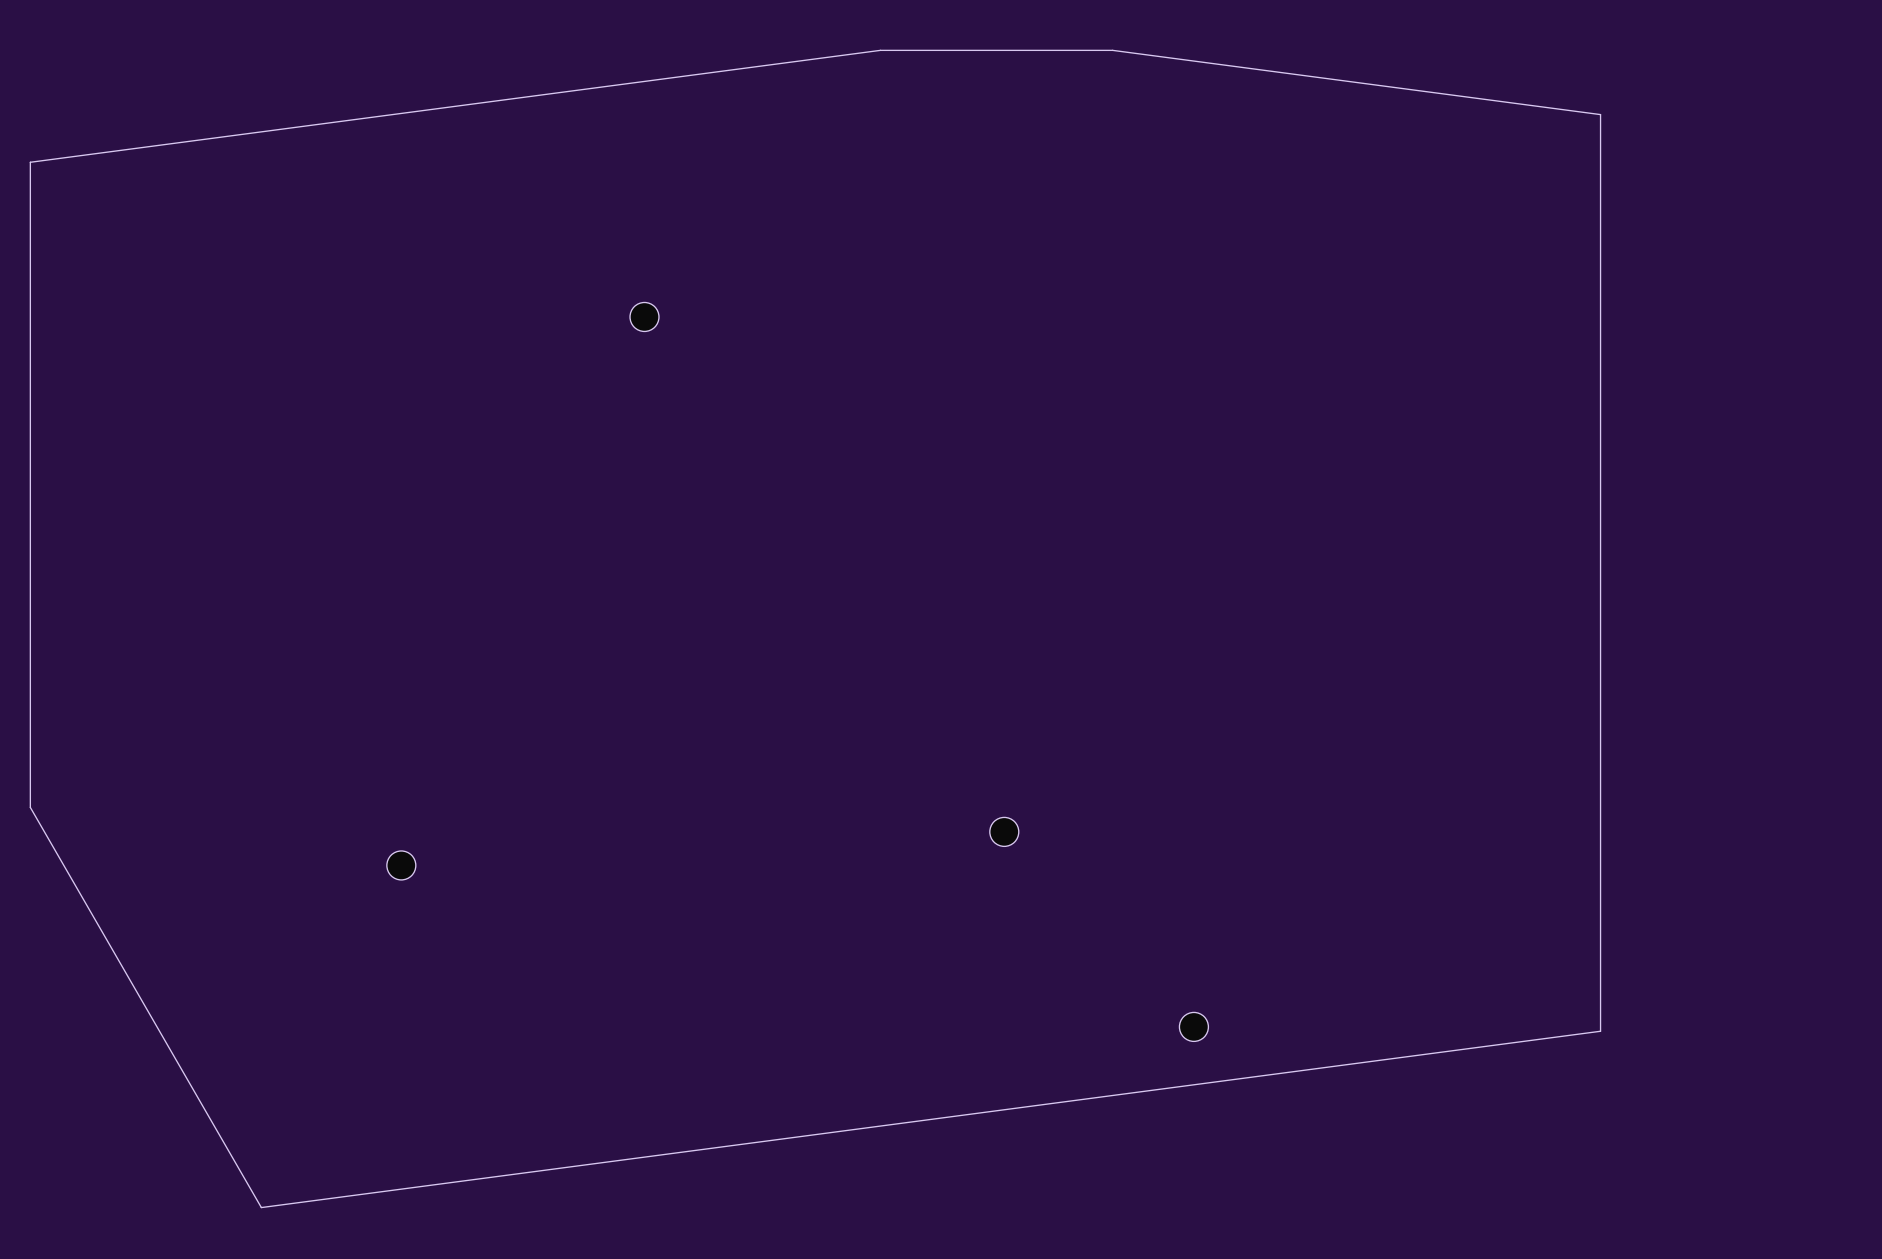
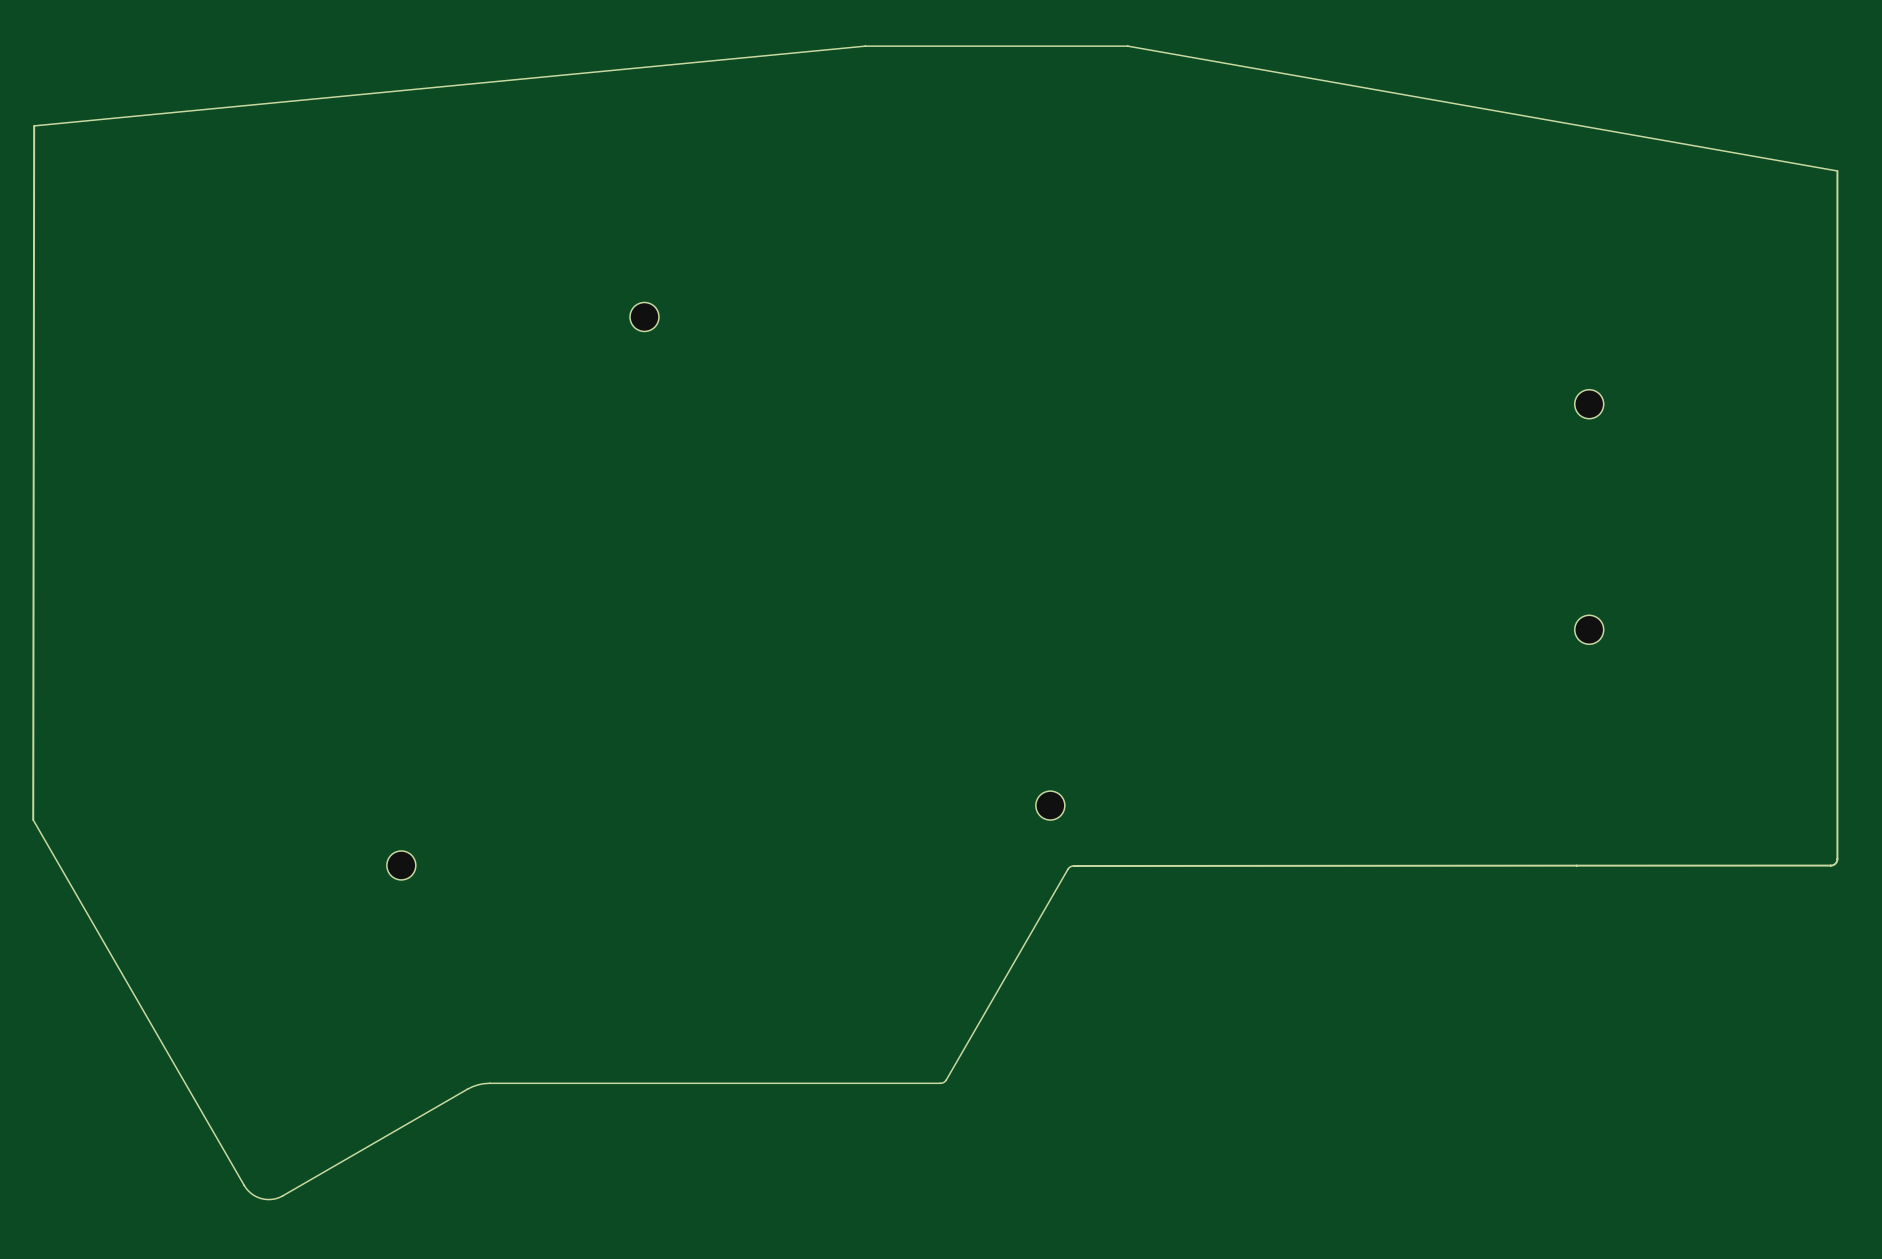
board edge: (1112, 50) (1600, 114) (1600, 1031) (261, 1207) (30, 807) (30, 162) (880, 50) (1112, 50) -> (1127, 46) (1837, 170) (1836, 863) (1830, 865) (1071, 866) (1067, 869) (943, 1082) (483, 1083) (467, 1089) (280, 1197) (267, 1199) (252, 1194) (244, 1185) (33, 819) (34, 125) (865, 46) (1127, 46)
part: none -> (1589, 404)
part: none -> (1589, 629)
part position: (1004, 831) -> (1050, 805)
part: (1193, 1026) -> none

